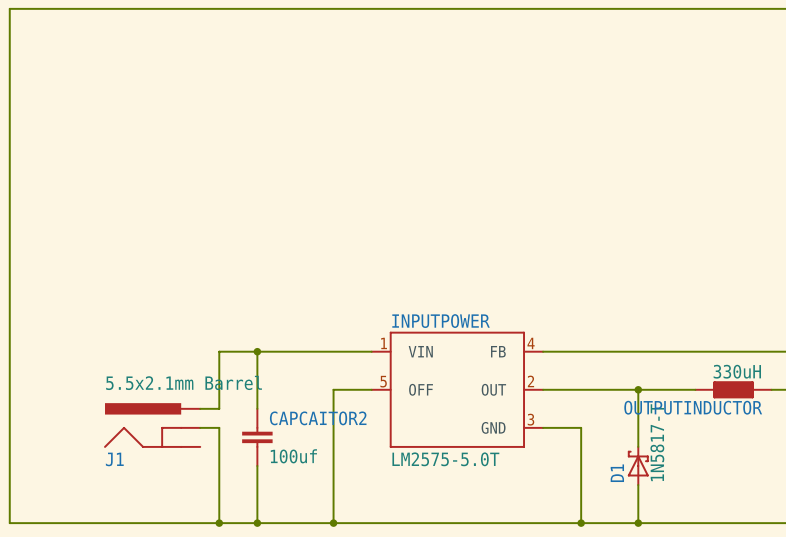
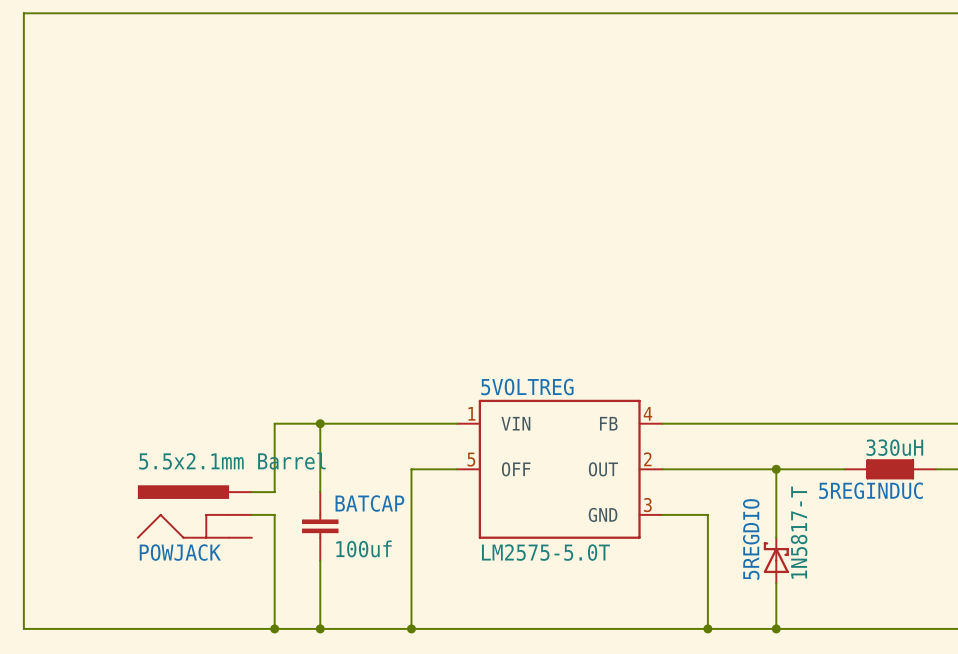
INPUTPOWER name: INPUTPOWER (441, 321) -> 5VOLTREG (527, 387)
OUTPUTINDUCTOR name: OUTPUTINDUCTOR (693, 407) -> 5REGINDUC (871, 490)
CAPCAITOR2 name: CAPCAITOR2 (318, 418) -> BATCAP (369, 503)
J1 name: J1 (114, 459) -> POWJACK (180, 552)
D1 name: D1 (617, 473) -> 5REGDIO (751, 539)

